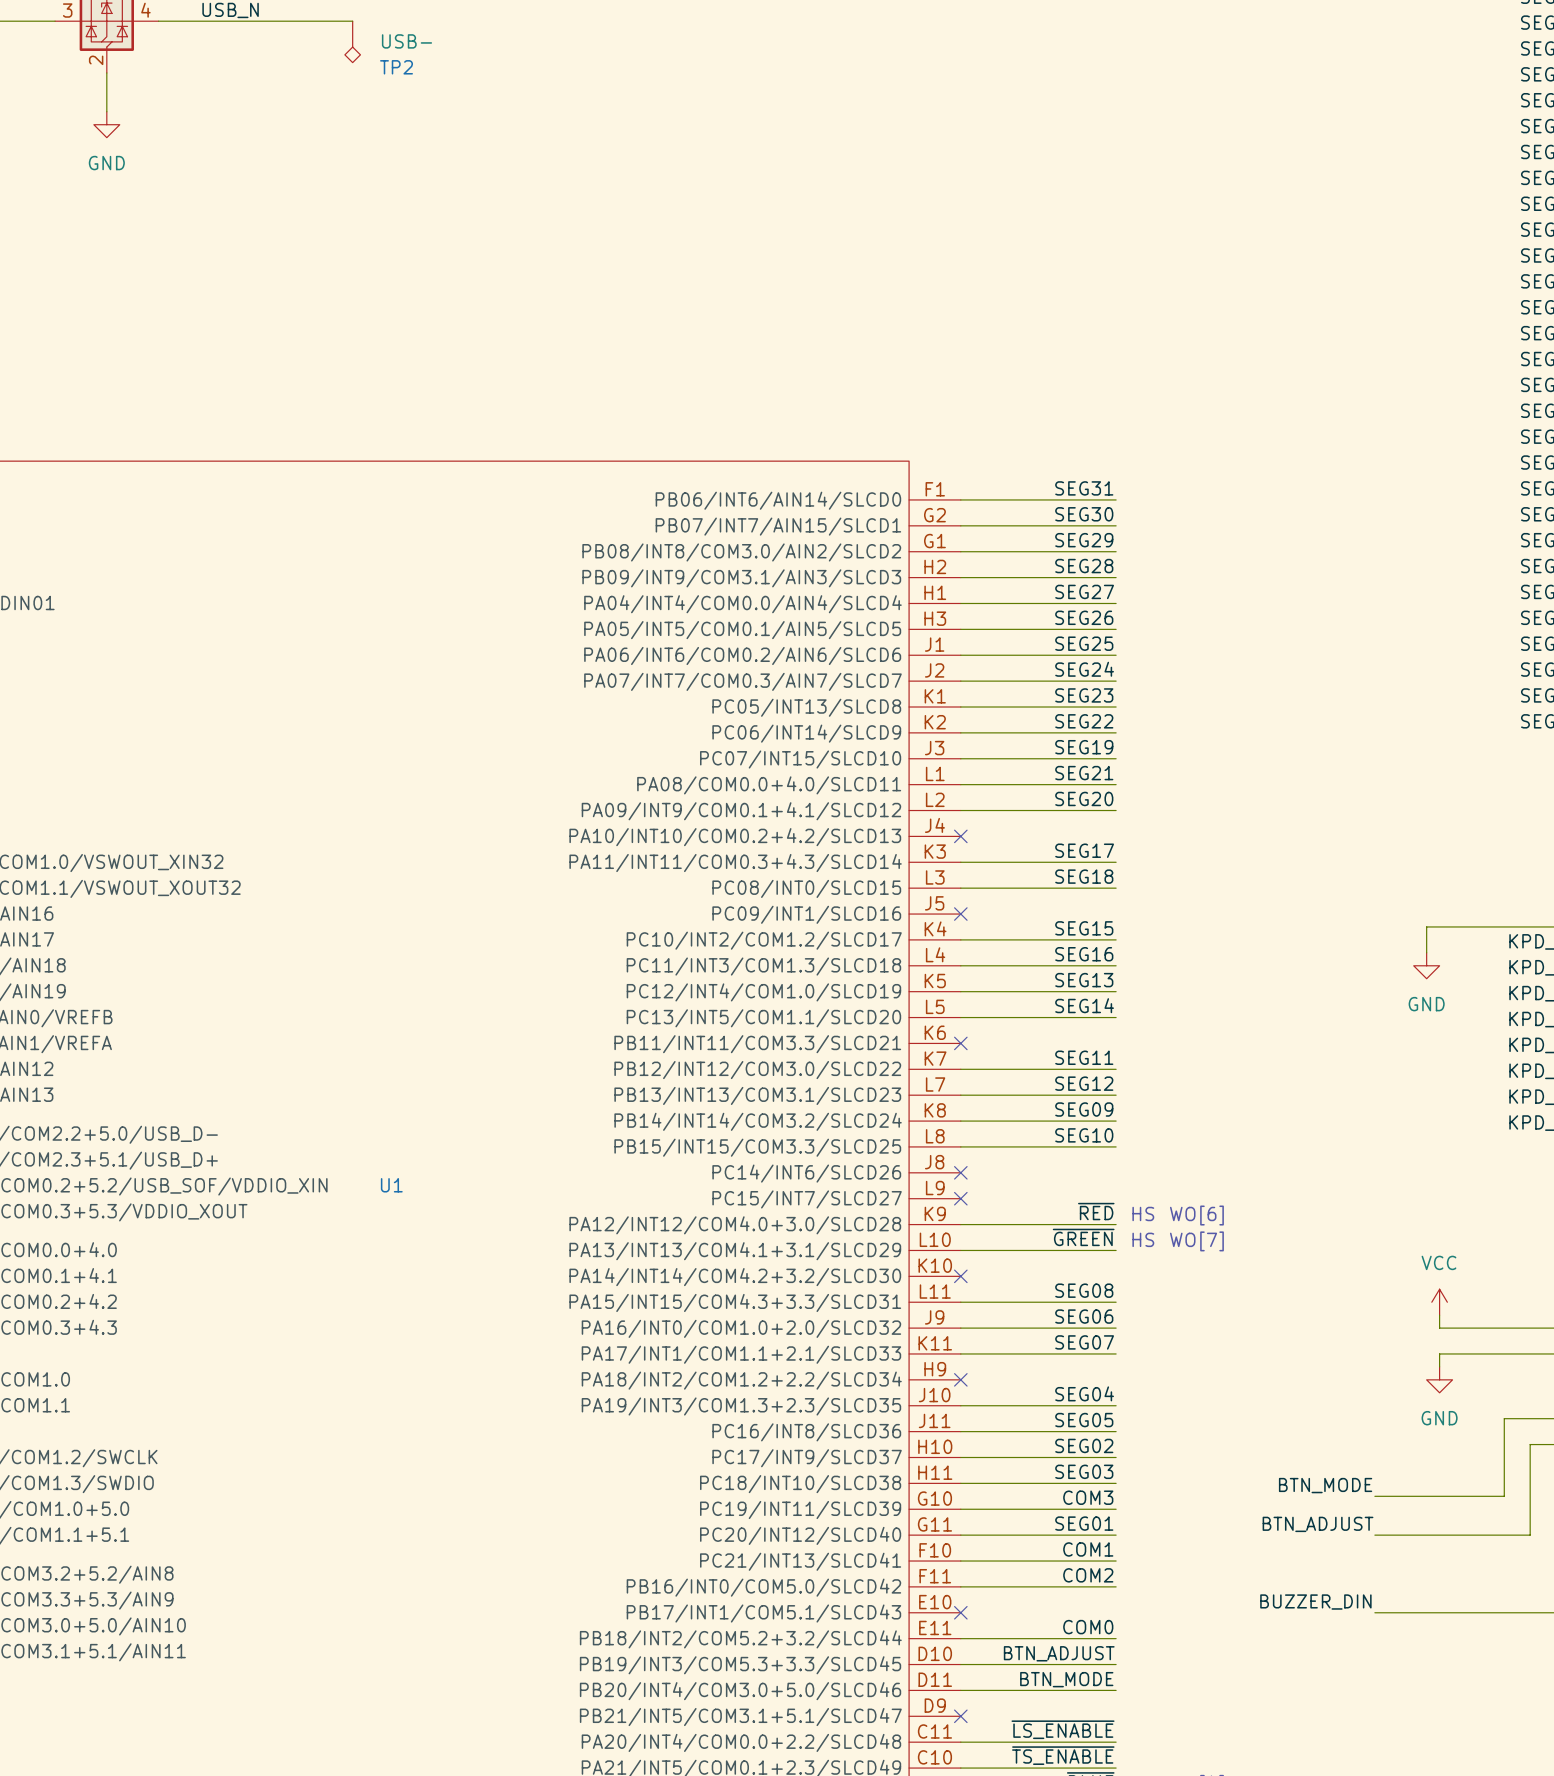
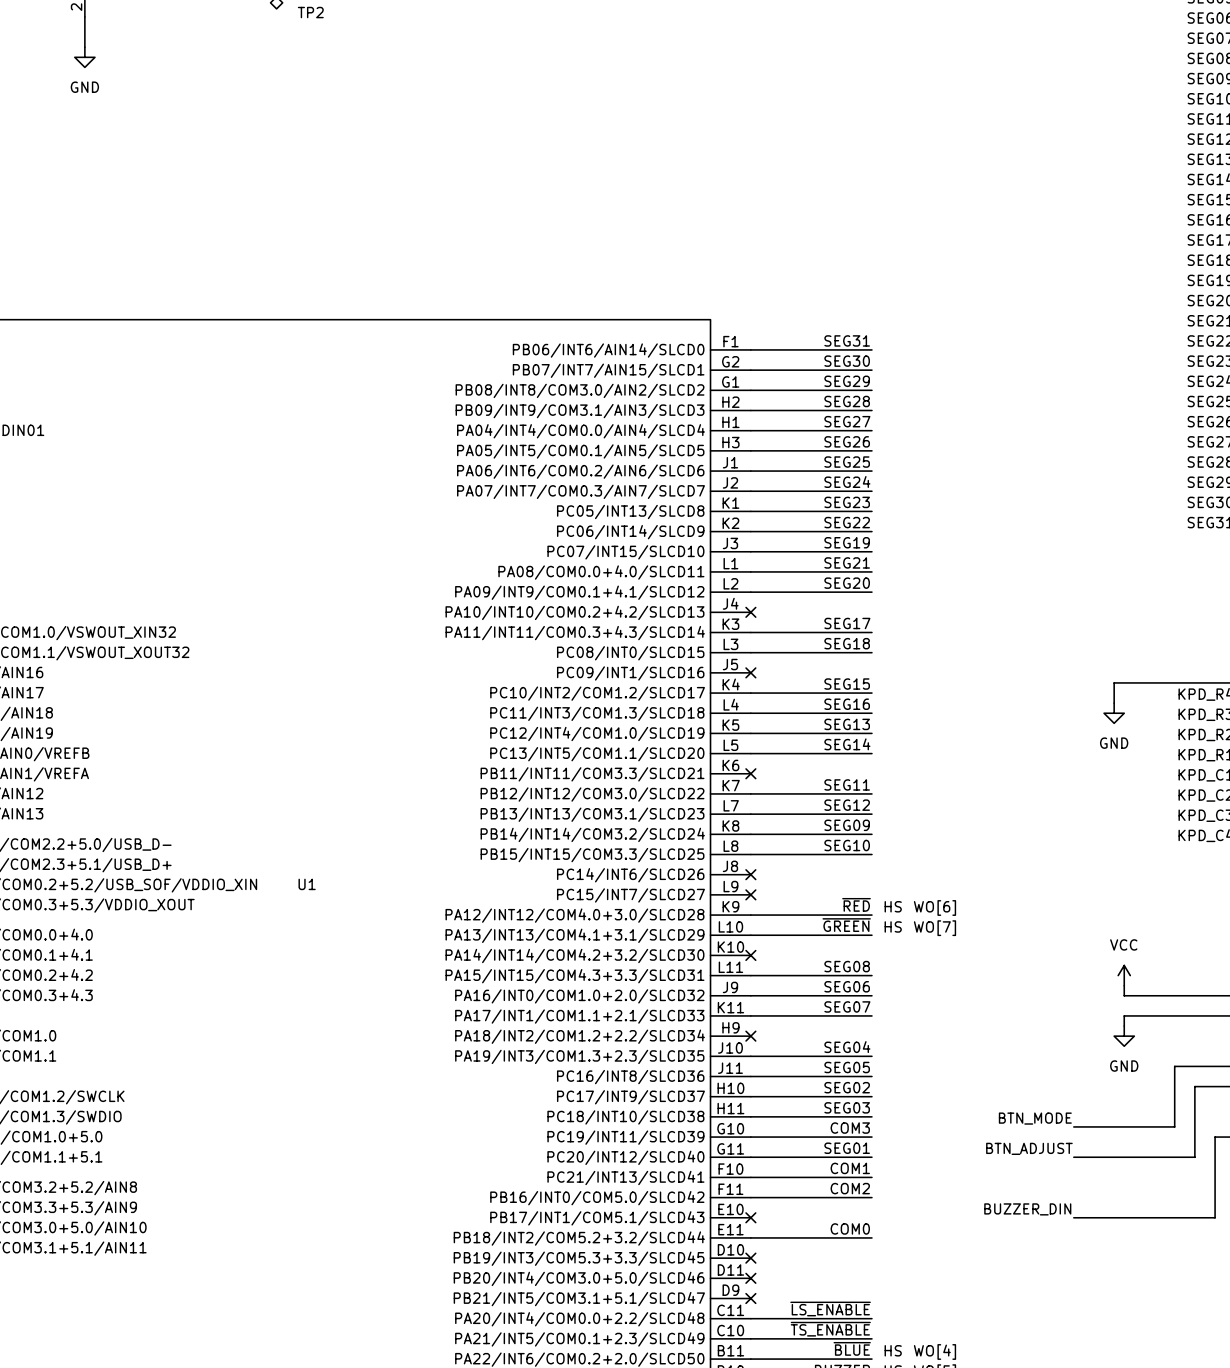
label: BTN_ADJUST (1059, 1653) -> none
wire: (960, 1664) (1116, 1664) -> none
no-connect mark: none -> (750, 1258)
label: BTN_MODE (1066, 1679) -> none
wire: (960, 1690) (1116, 1690) -> none
no-connect mark: none -> (750, 1278)

